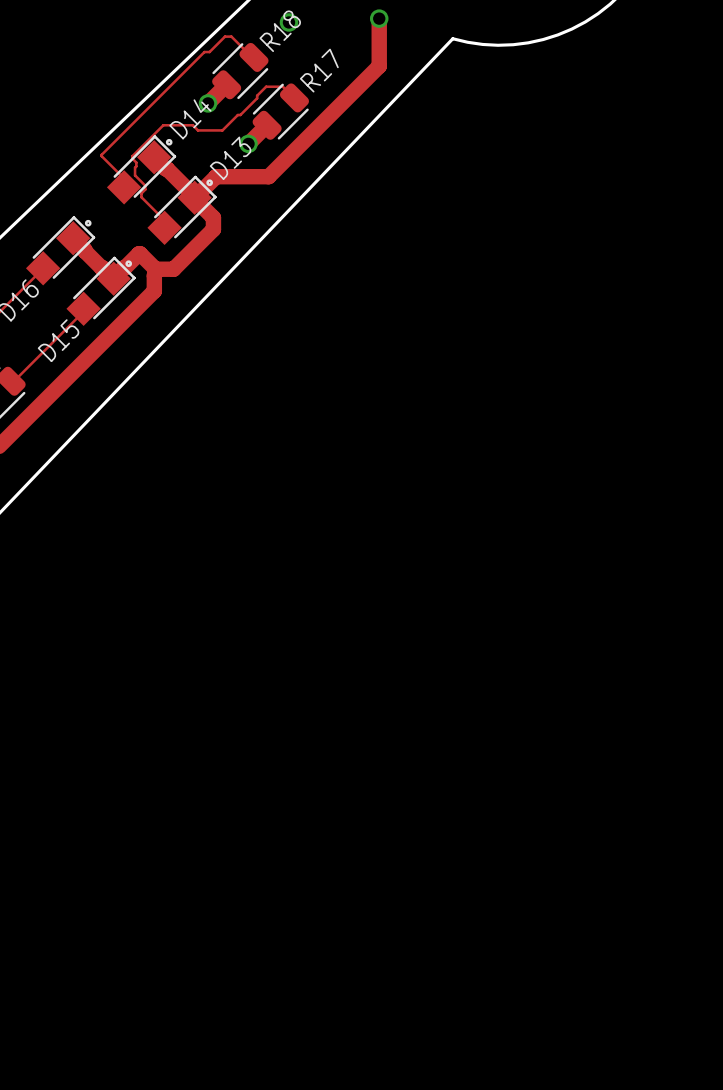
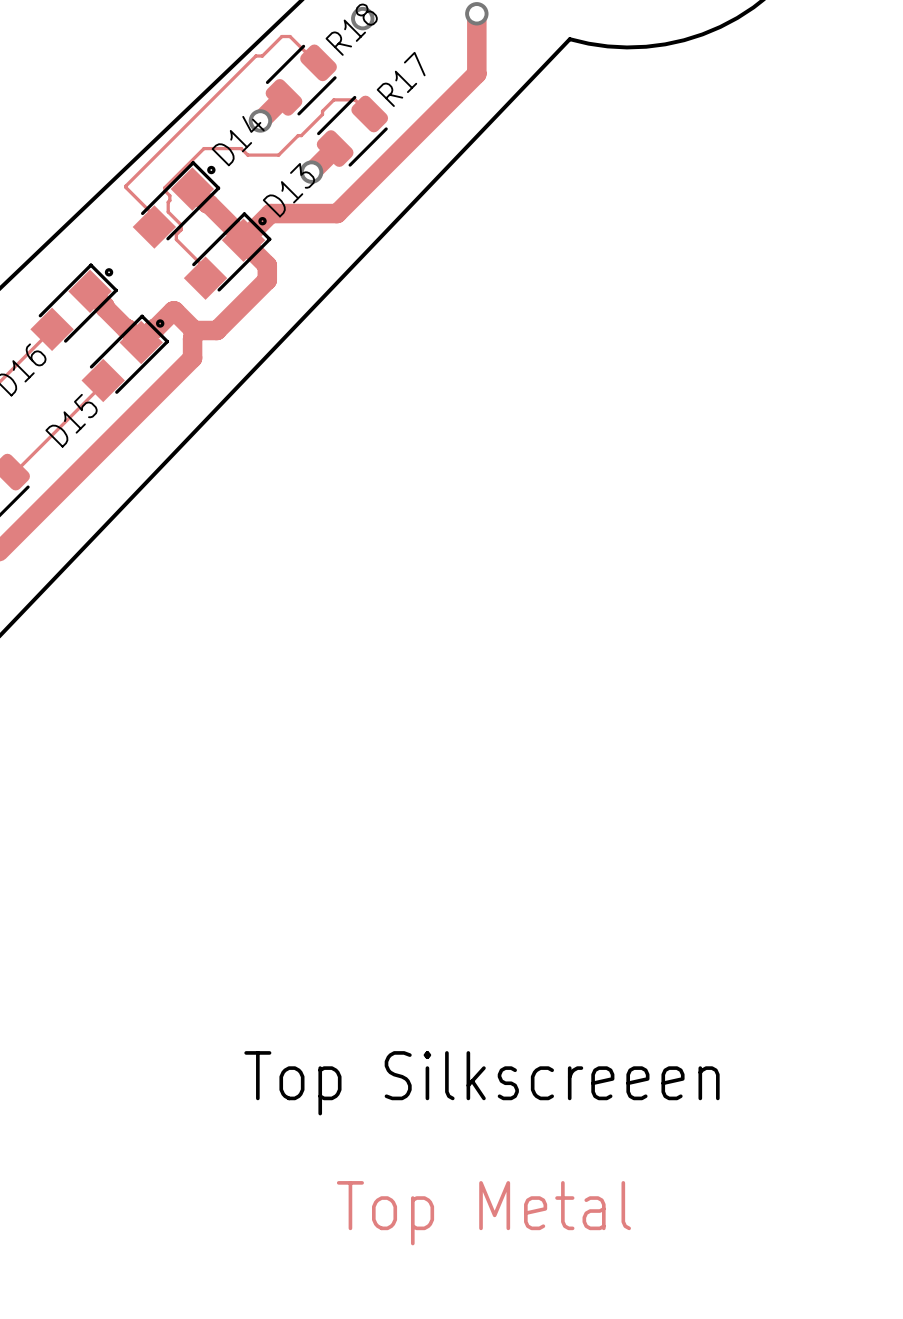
drawing: none -> [244, 1051, 720, 1246]

